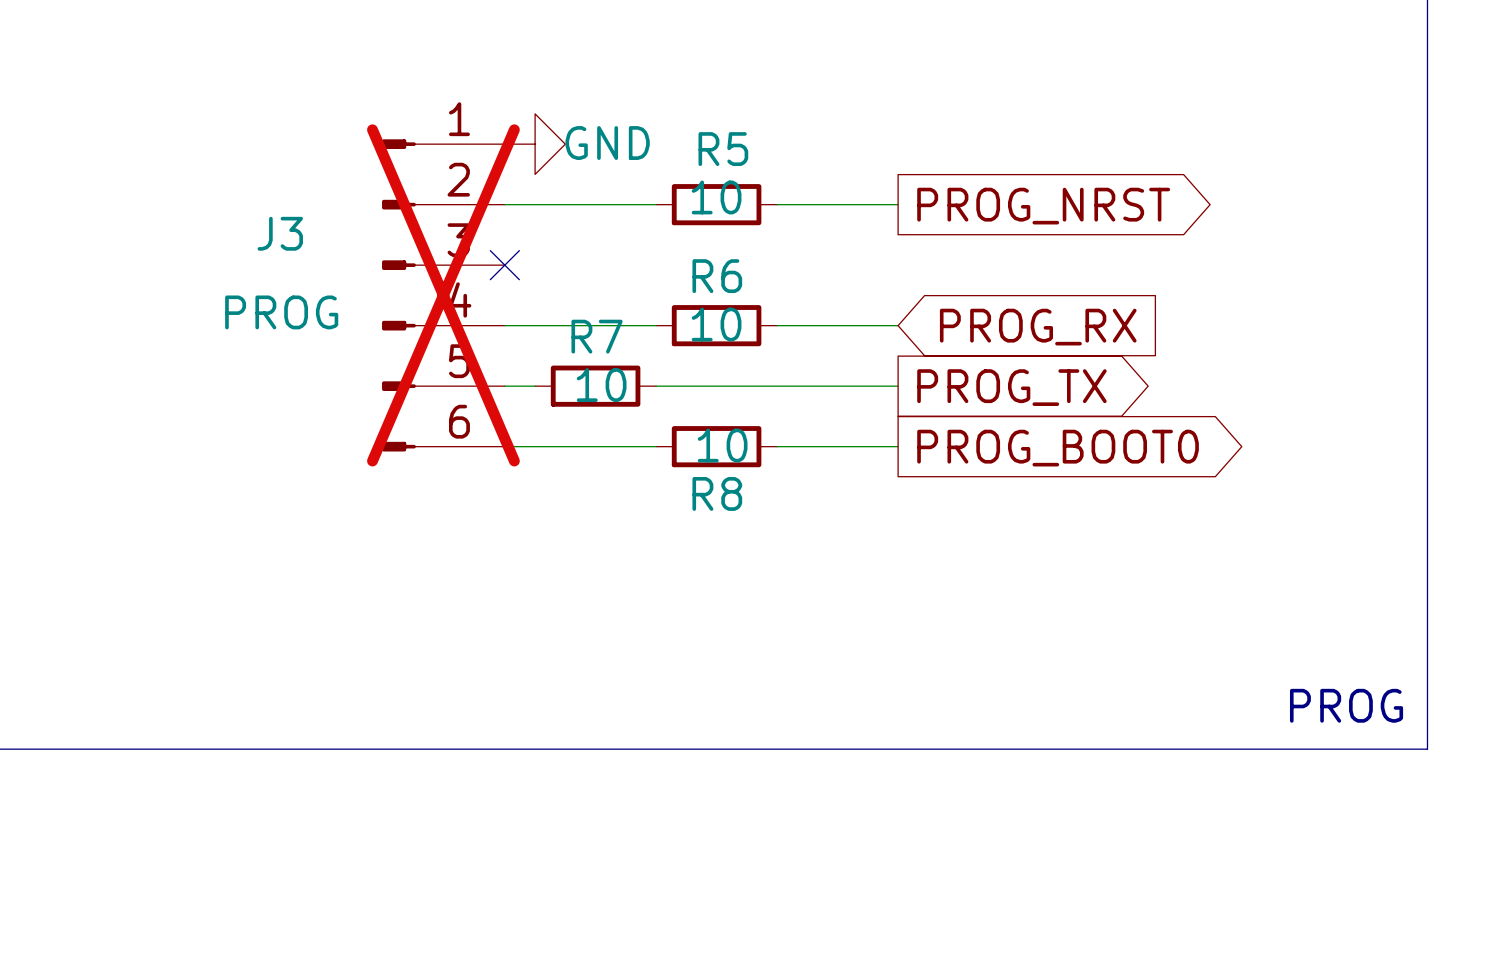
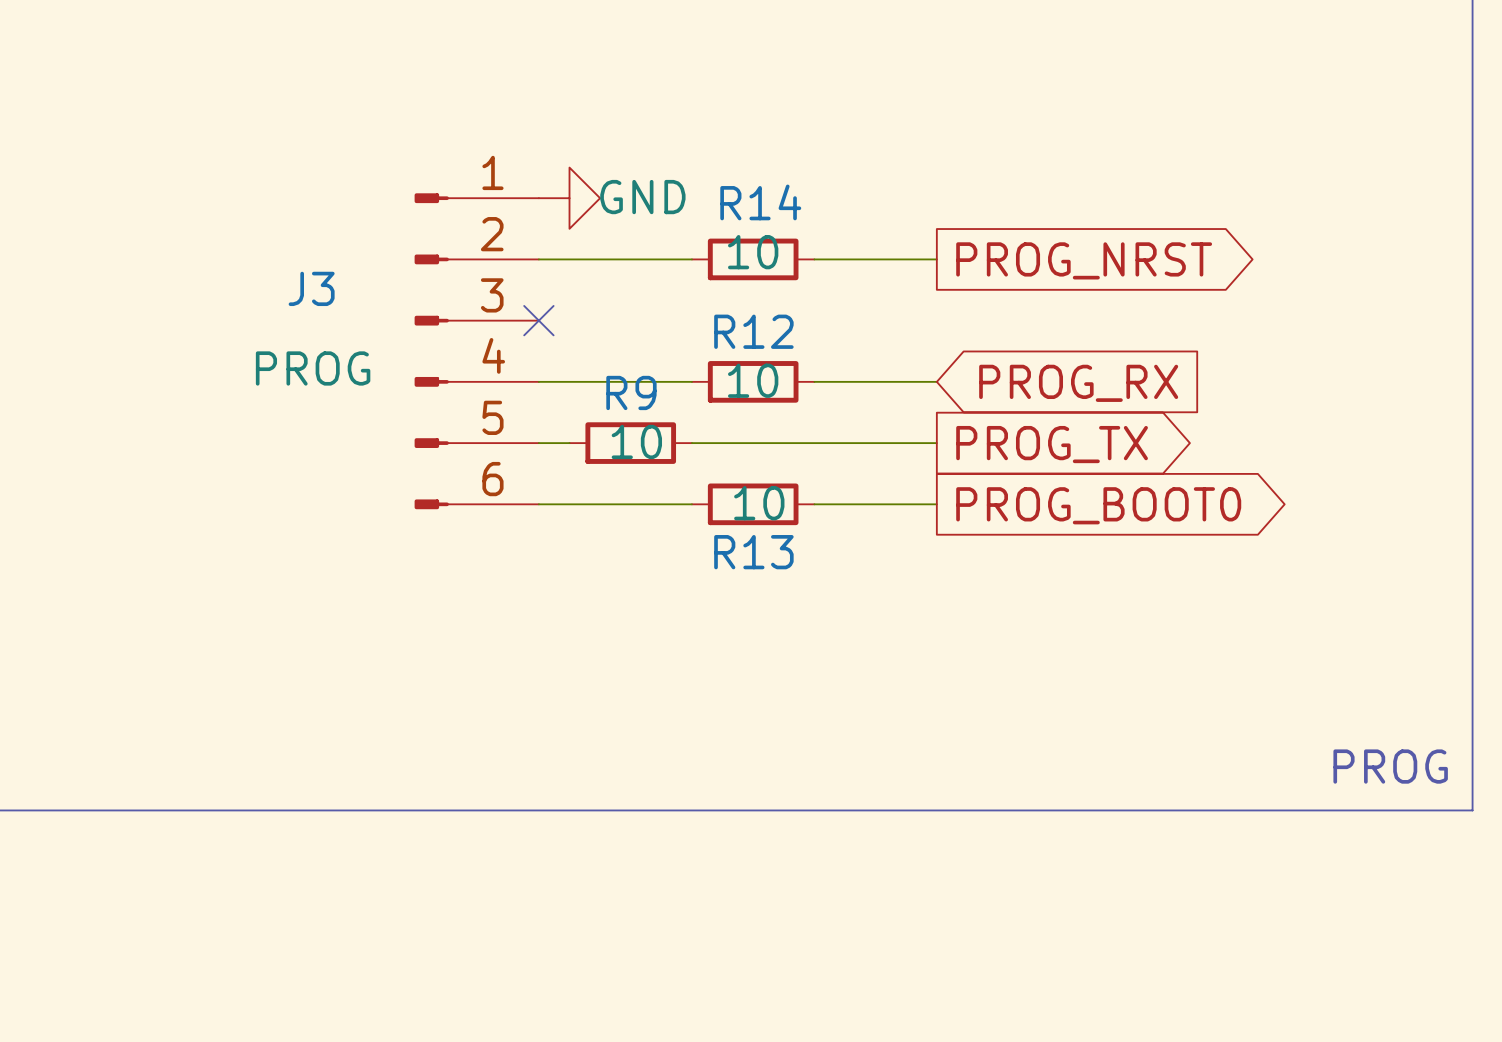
R5 name: R5 (723, 149) -> R14 (760, 202)
R6 name: R6 (717, 276) -> R12 (753, 331)
J3 do-not-place cross: (443, 295) -> none
R7 name: R7 (597, 336) -> R9 (631, 392)
R8 name: R8 (717, 493) -> R13 (753, 552)

